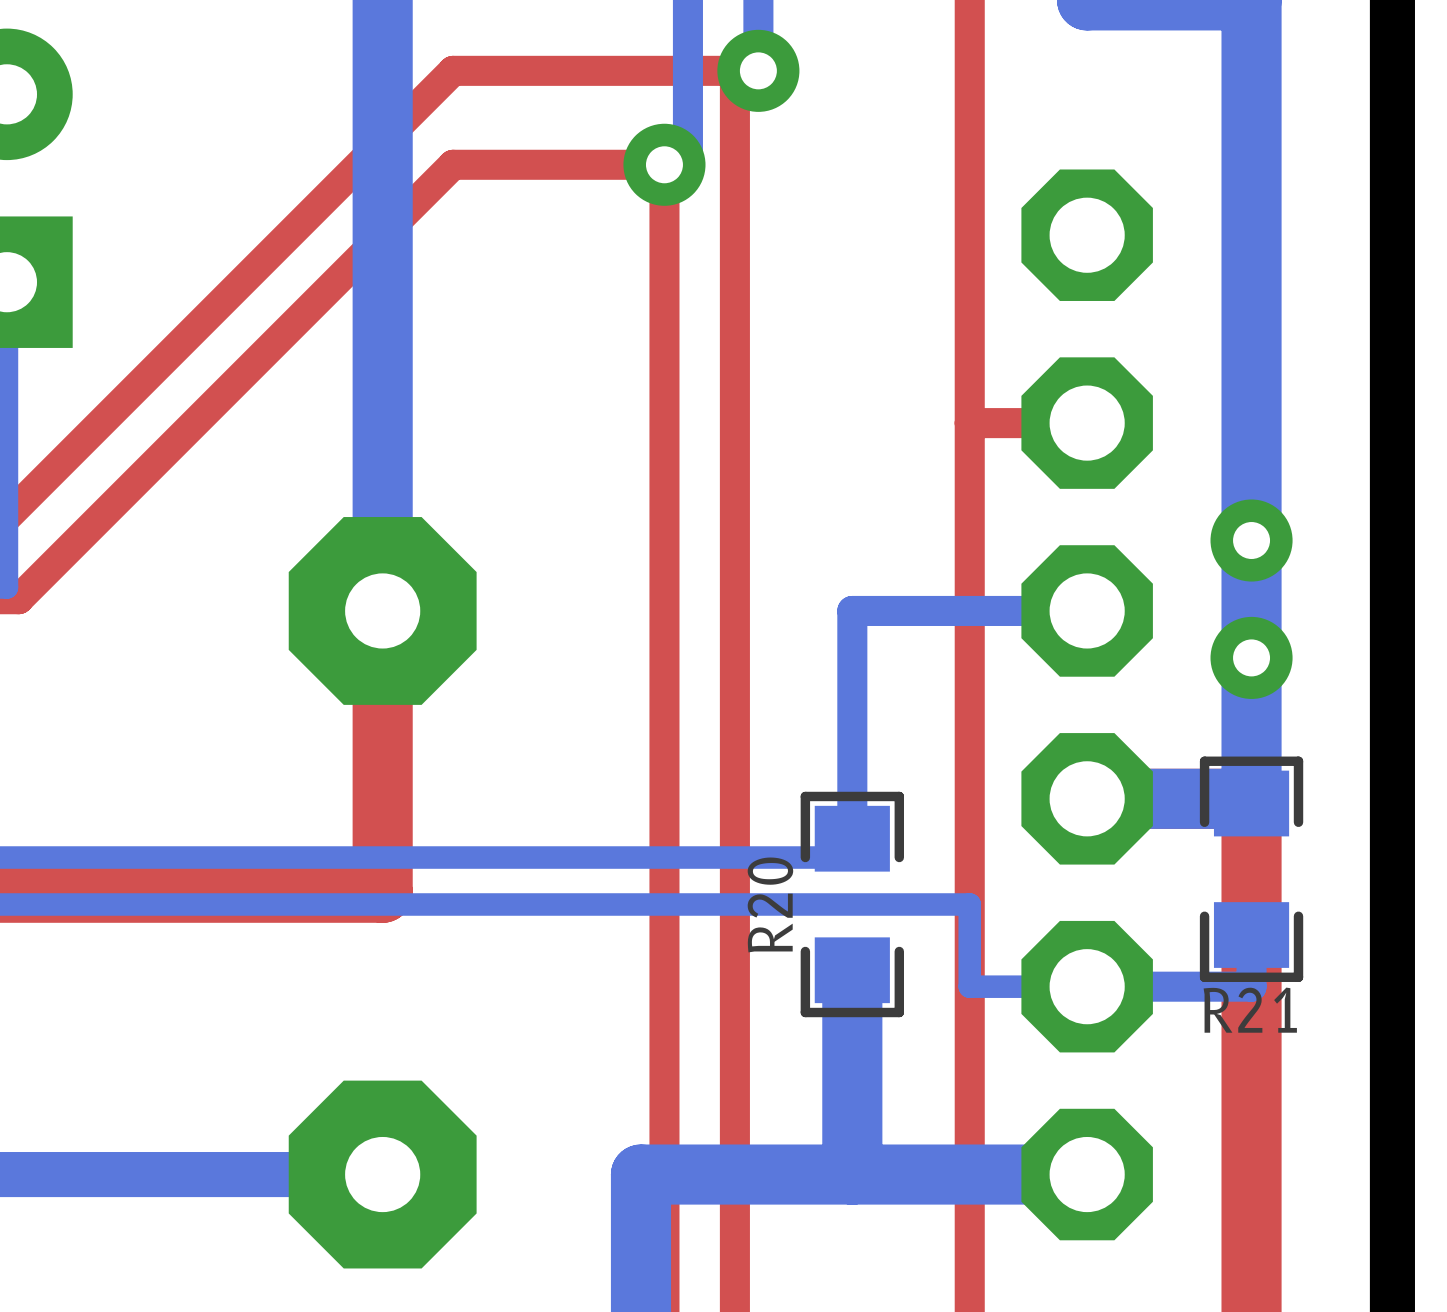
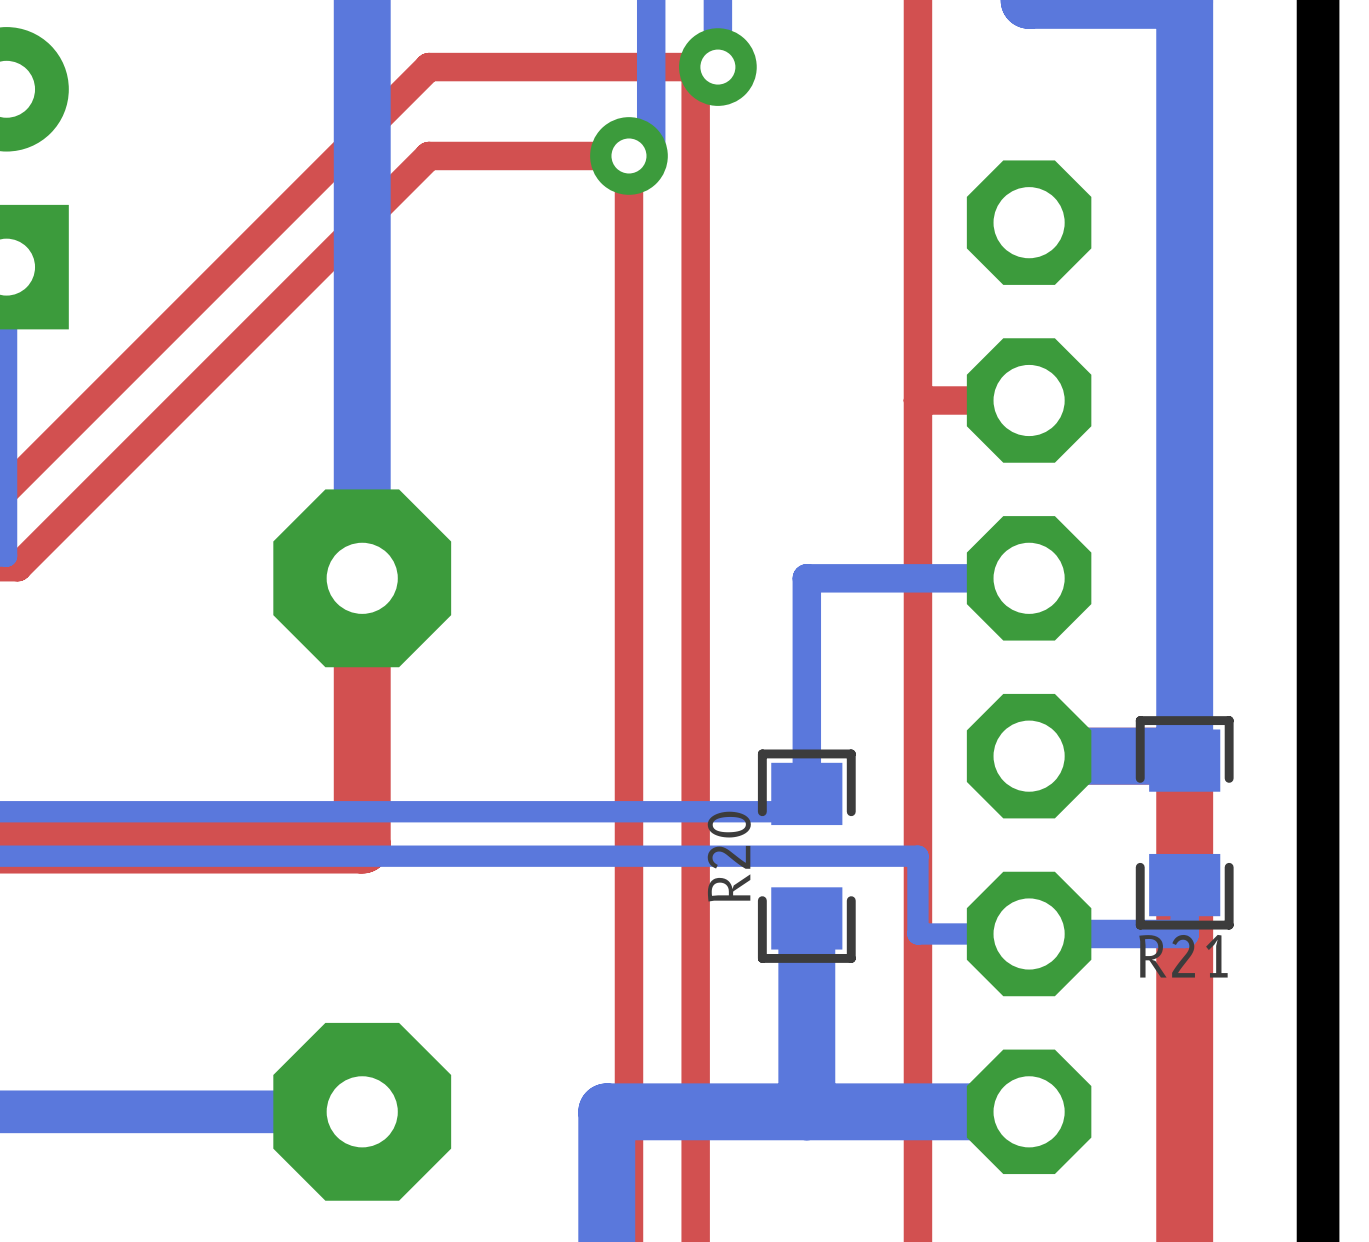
via: (1251, 540) -> none
via: (1251, 657) -> none

